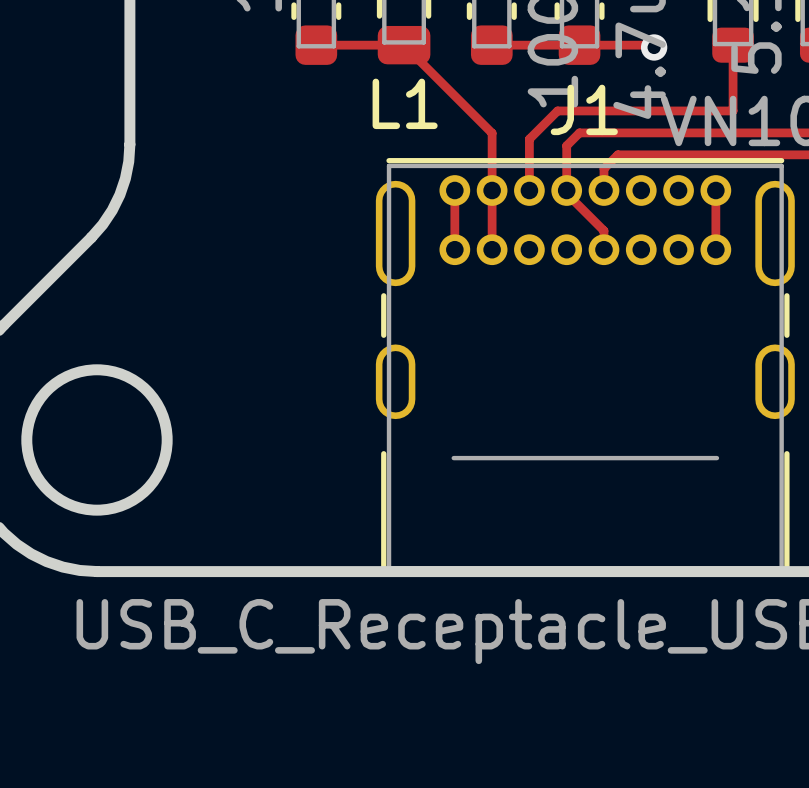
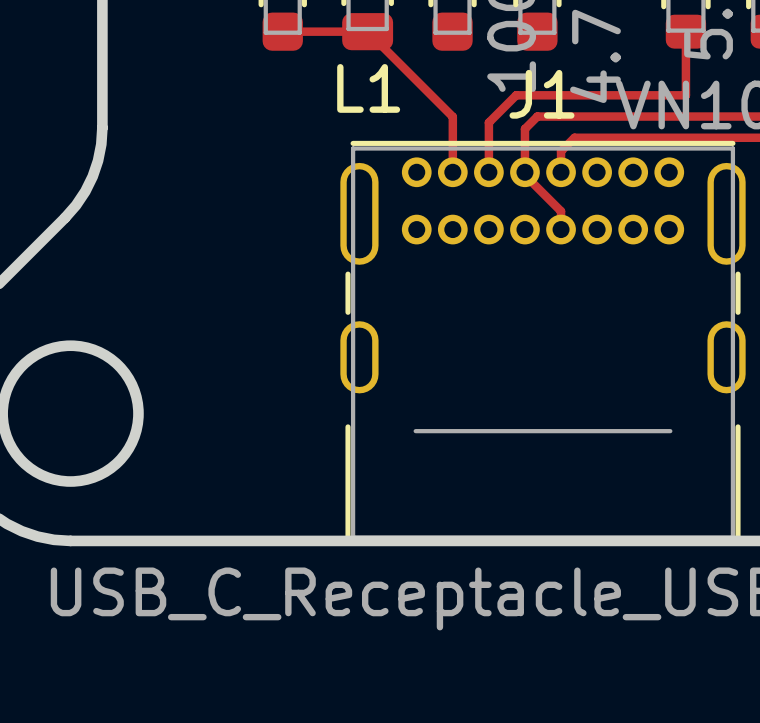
track: (491, 45) (651, 45) (654, 47) -> none
via: (654, 47) -> none
track: (454, 190) (454, 249) -> none
track: (492, 190) (492, 249) -> none
track: (715, 190) (715, 249) -> none

